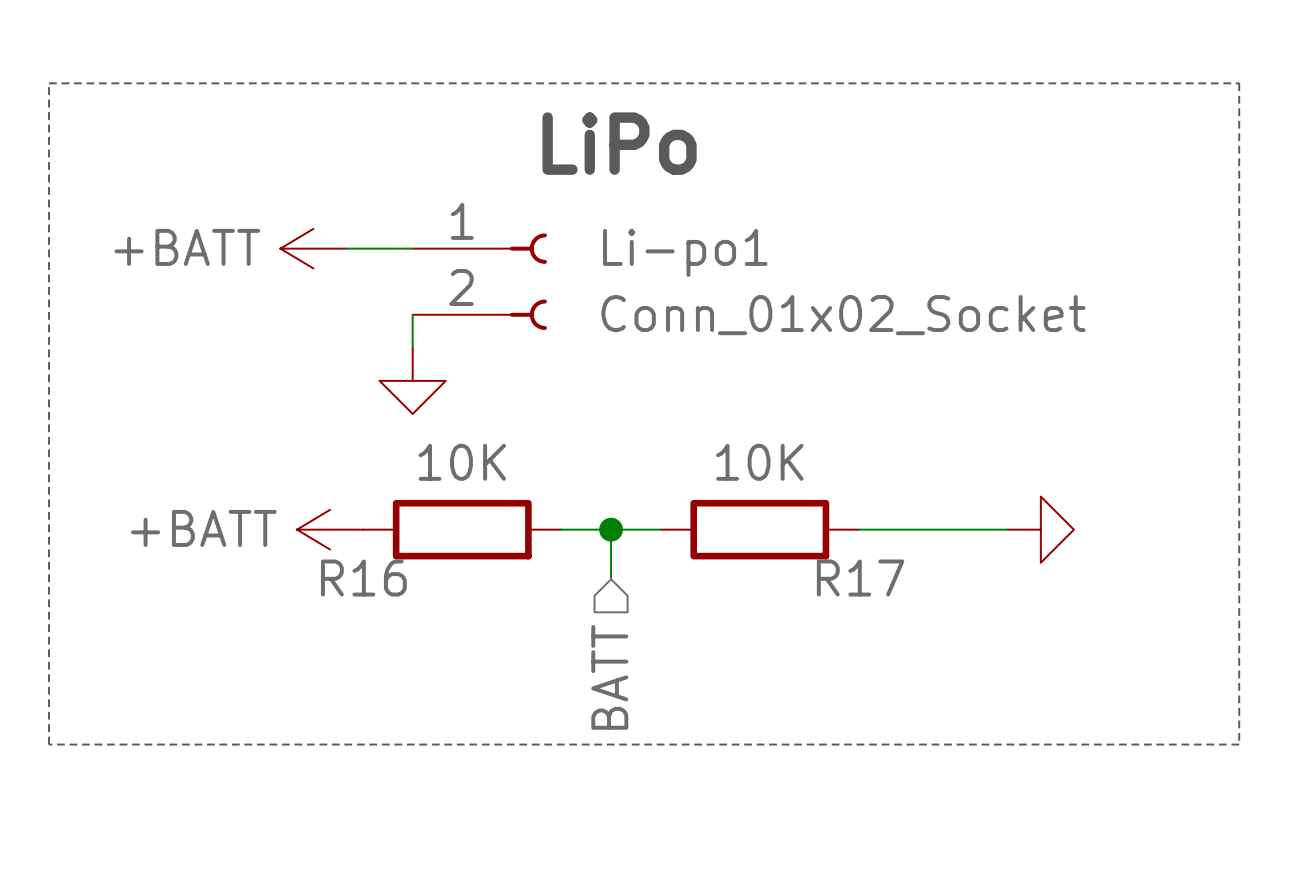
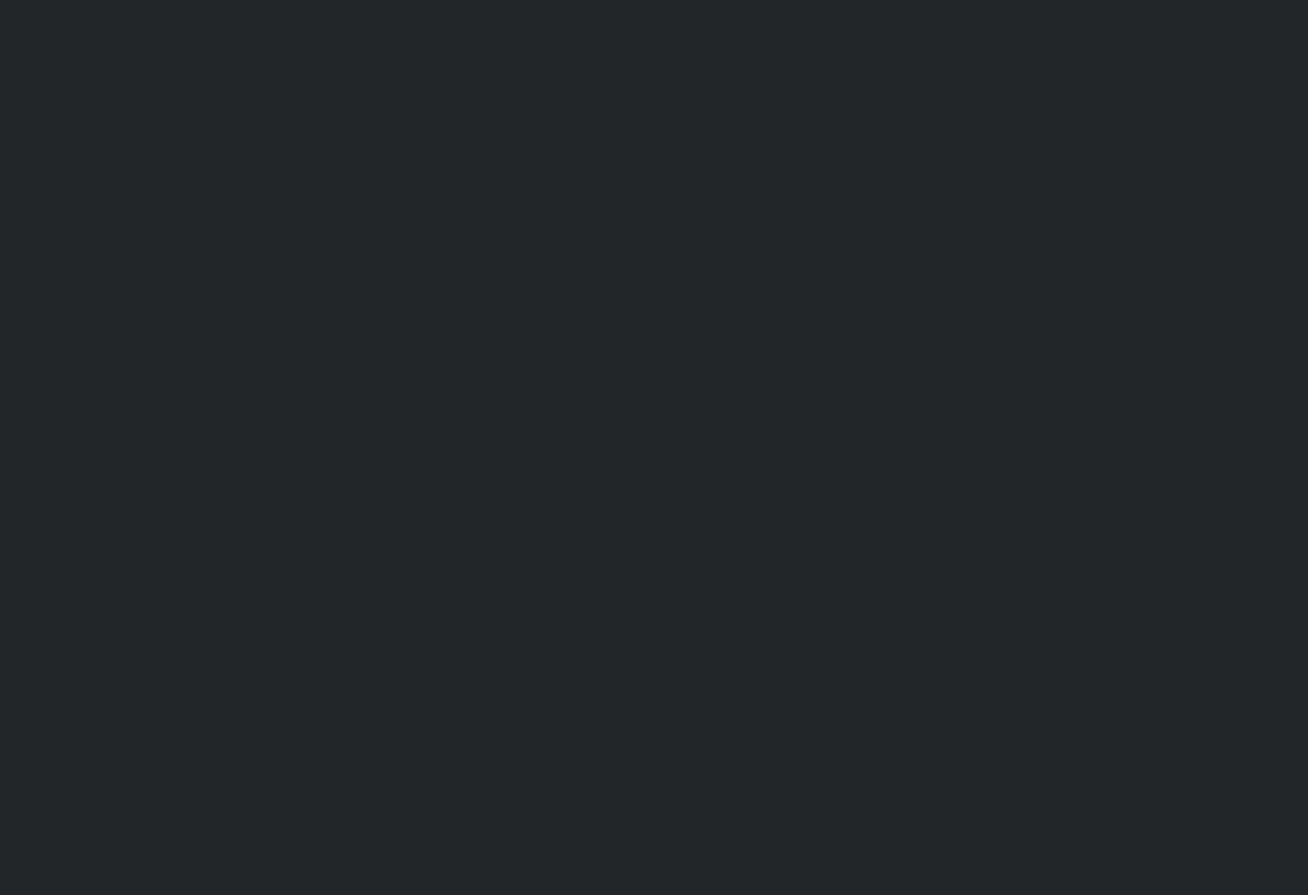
line: (49, 83) (1239, 83) (1239, 744) (49, 744) (49, 83) -> none
text: LiPo (619, 143) -> none
power symbol: +BATT (313, 248) -> none
wire: (346, 248) (412, 248) -> none
Li-po1: Conn_01x02_Socket (479, 281) -> none
wire: (412, 314) (412, 347) -> none
power symbol: (412, 380) -> none
power symbol: +BATT (330, 529) -> none
R16: 10K (462, 529) -> none
wire: (561, 529) (660, 529) -> none
wire: (611, 529) (611, 579) -> none
junction: (611, 529) -> none
R17: 10K (759, 529) -> none
wire: (859, 529) (1007, 529) -> none
power symbol: (1040, 529) -> none
hierarchical label: BATT (609, 677) -> none

